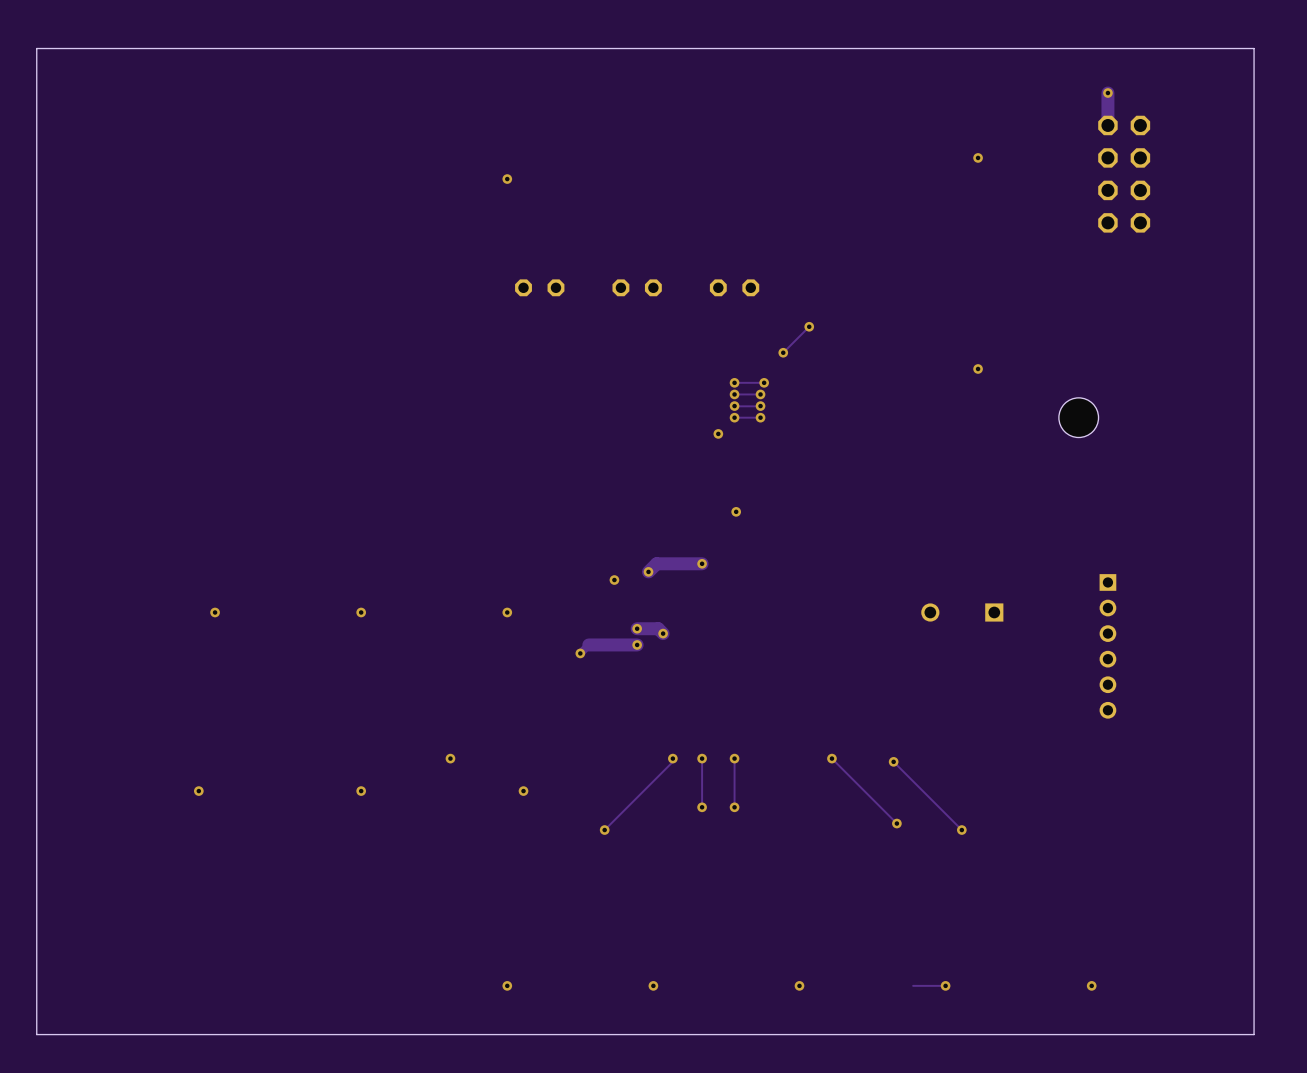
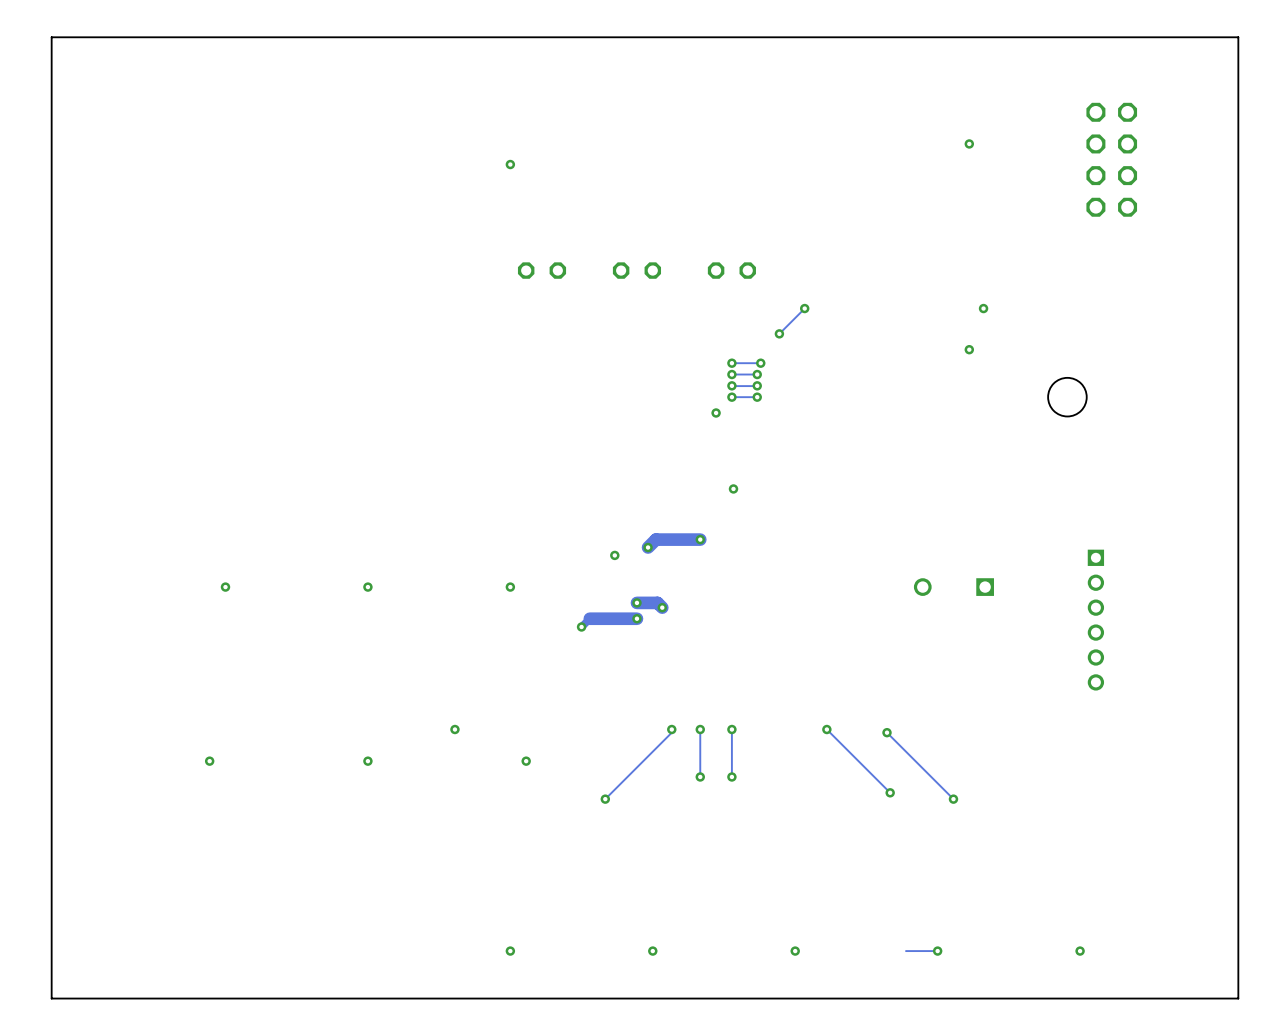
track: (1107, 93) (1107, 125) -> none
via: (1107, 93) -> none
via: none -> (983, 308)

